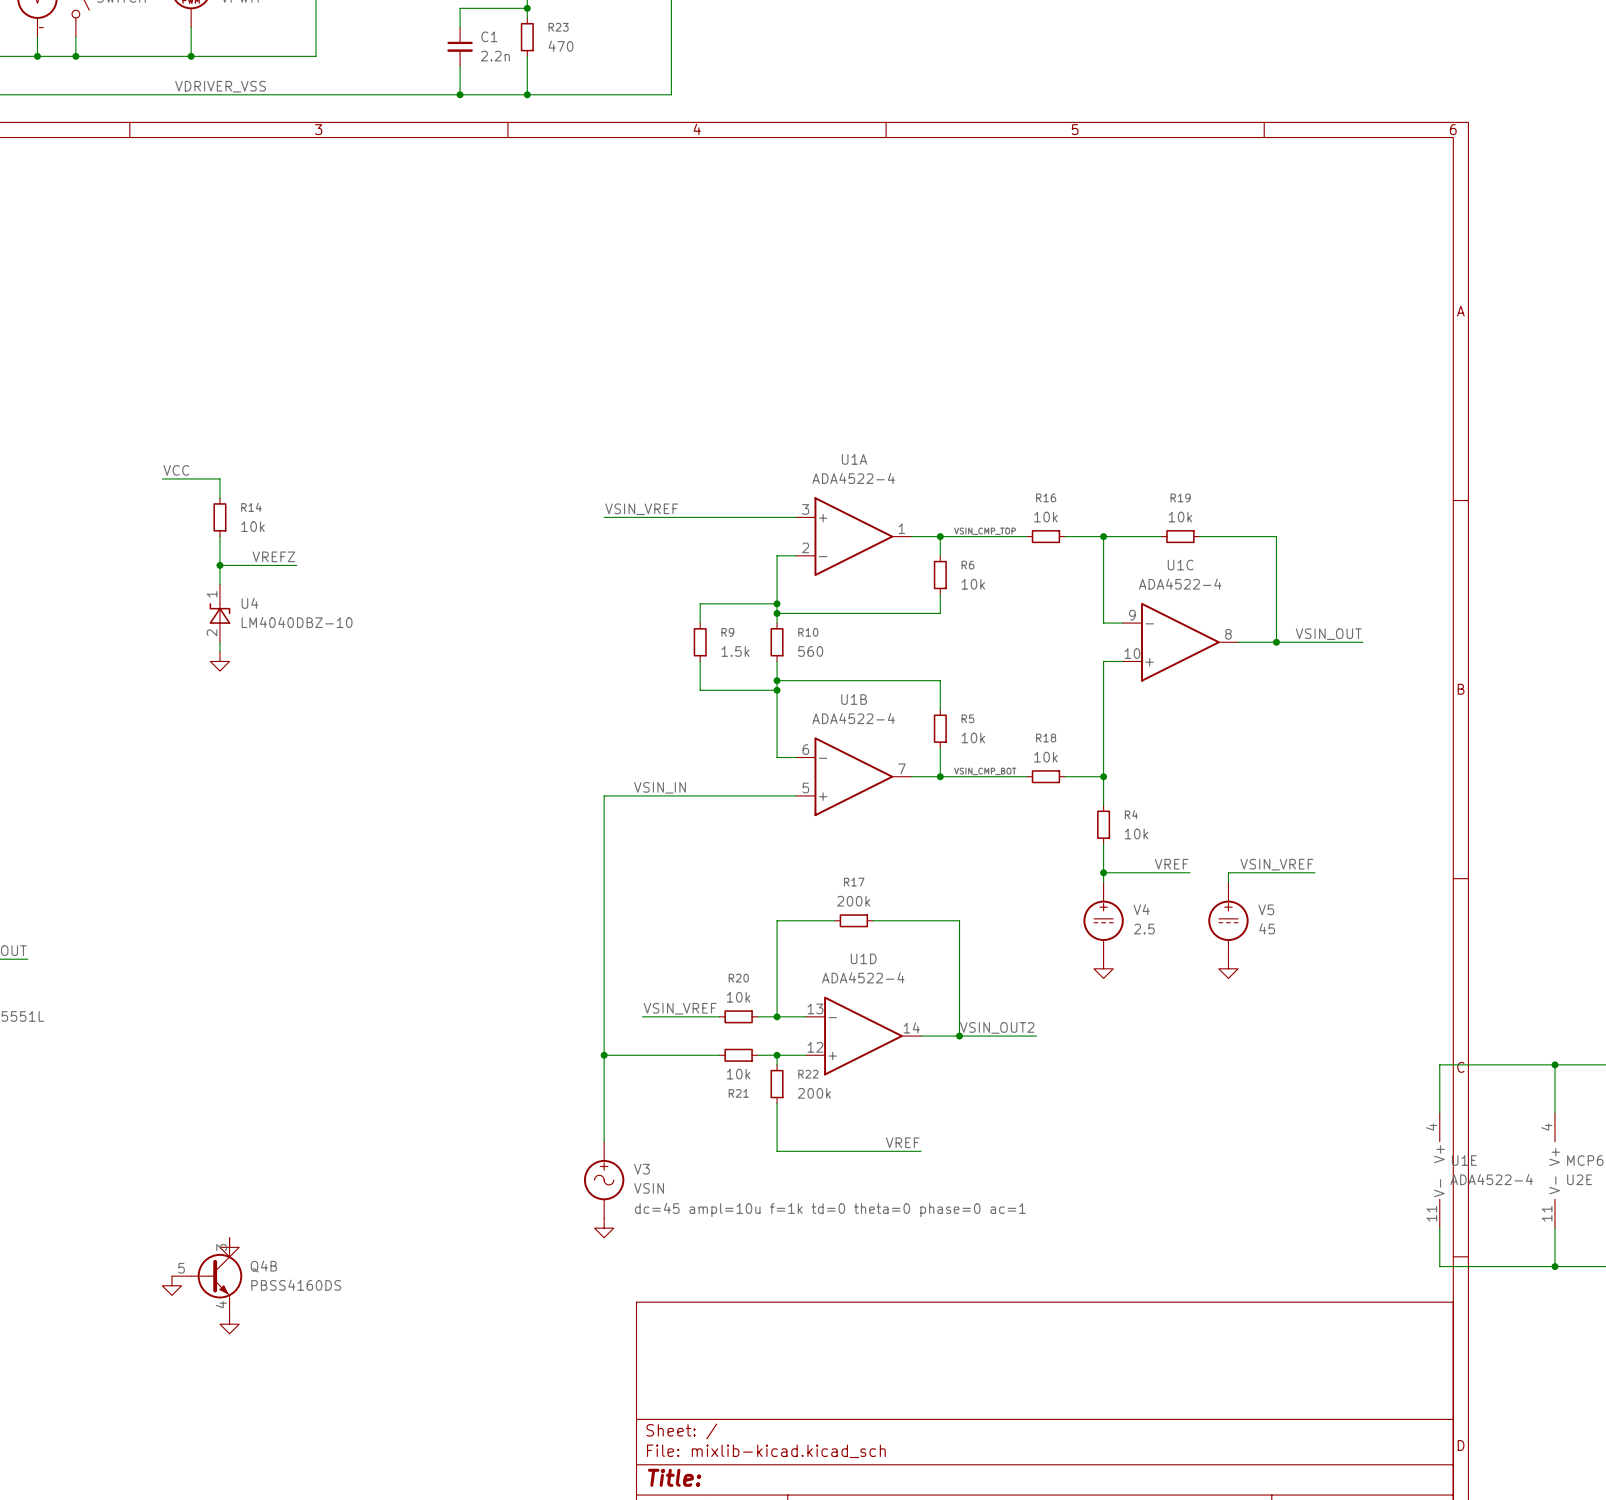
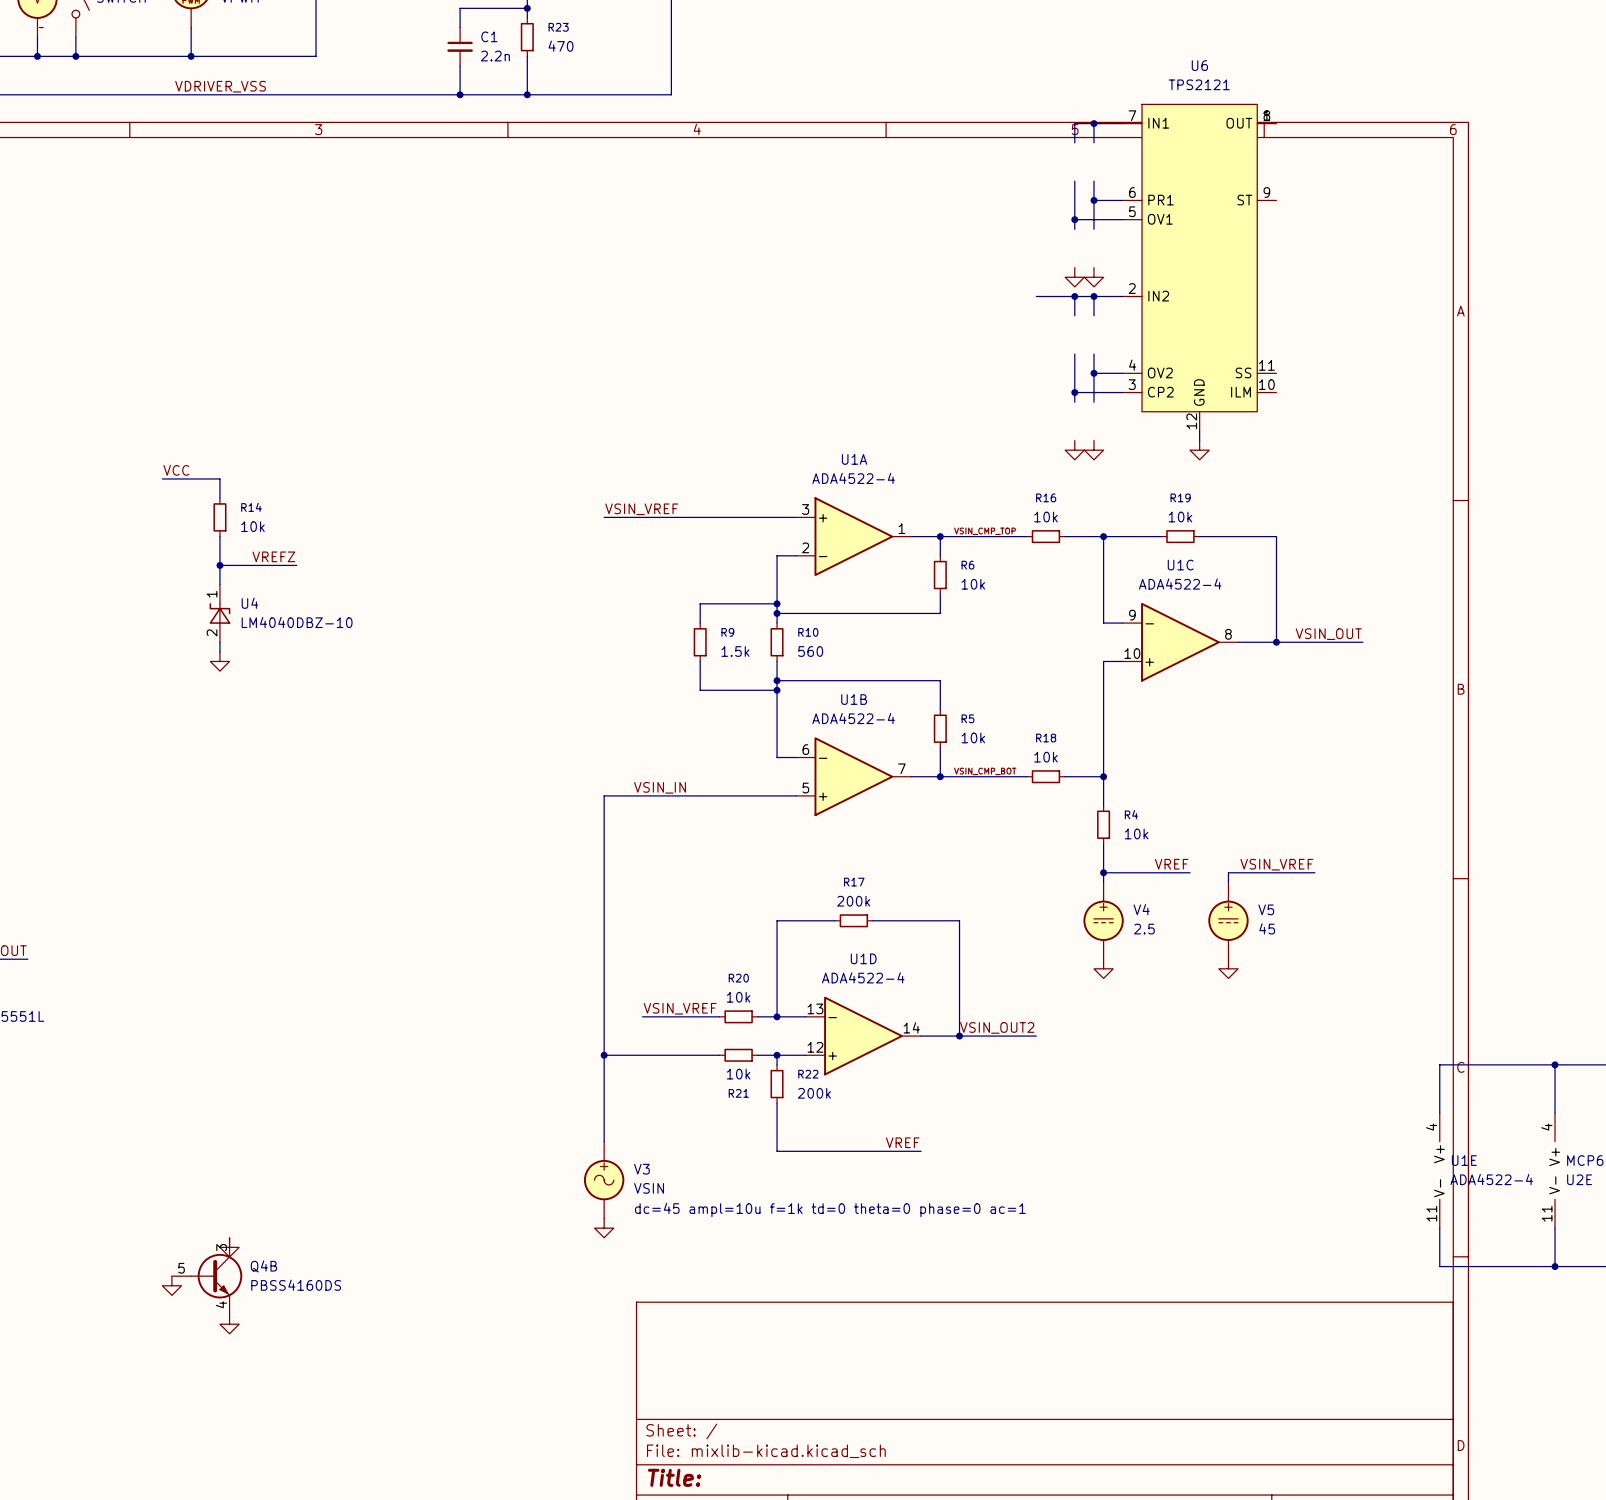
wire: none -> (1093, 123) (1093, 142)
junction: none -> (1093, 123)
wire: none -> (1122, 123) (1074, 123) (1074, 142)
wire: none -> (1074, 181) (1074, 229)
wire: none -> (1093, 181) (1093, 229)
wire: none -> (1093, 200) (1122, 200)
junction: none -> (1093, 200)
wire: none -> (1074, 219) (1122, 219)
junction: none -> (1074, 219)
U6: none -> TPS2121 (1199, 267)
power symbol: none -> (1074, 277)
power symbol: none -> (1093, 277)
wire: none -> (1036, 296) (1122, 296)
wire: none -> (1074, 296) (1074, 315)
junction: none -> (1074, 296)
wire: none -> (1093, 296) (1093, 315)
junction: none -> (1093, 296)
wire: none -> (1074, 354) (1074, 402)
wire: none -> (1093, 354) (1093, 402)
wire: none -> (1093, 373) (1122, 373)
junction: none -> (1093, 373)
wire: none -> (1074, 392) (1122, 392)
junction: none -> (1074, 392)
wire: none -> (1199, 430) (1199, 440)
power symbol: none -> (1074, 450)
power symbol: none -> (1093, 450)
power symbol: none -> (1199, 450)

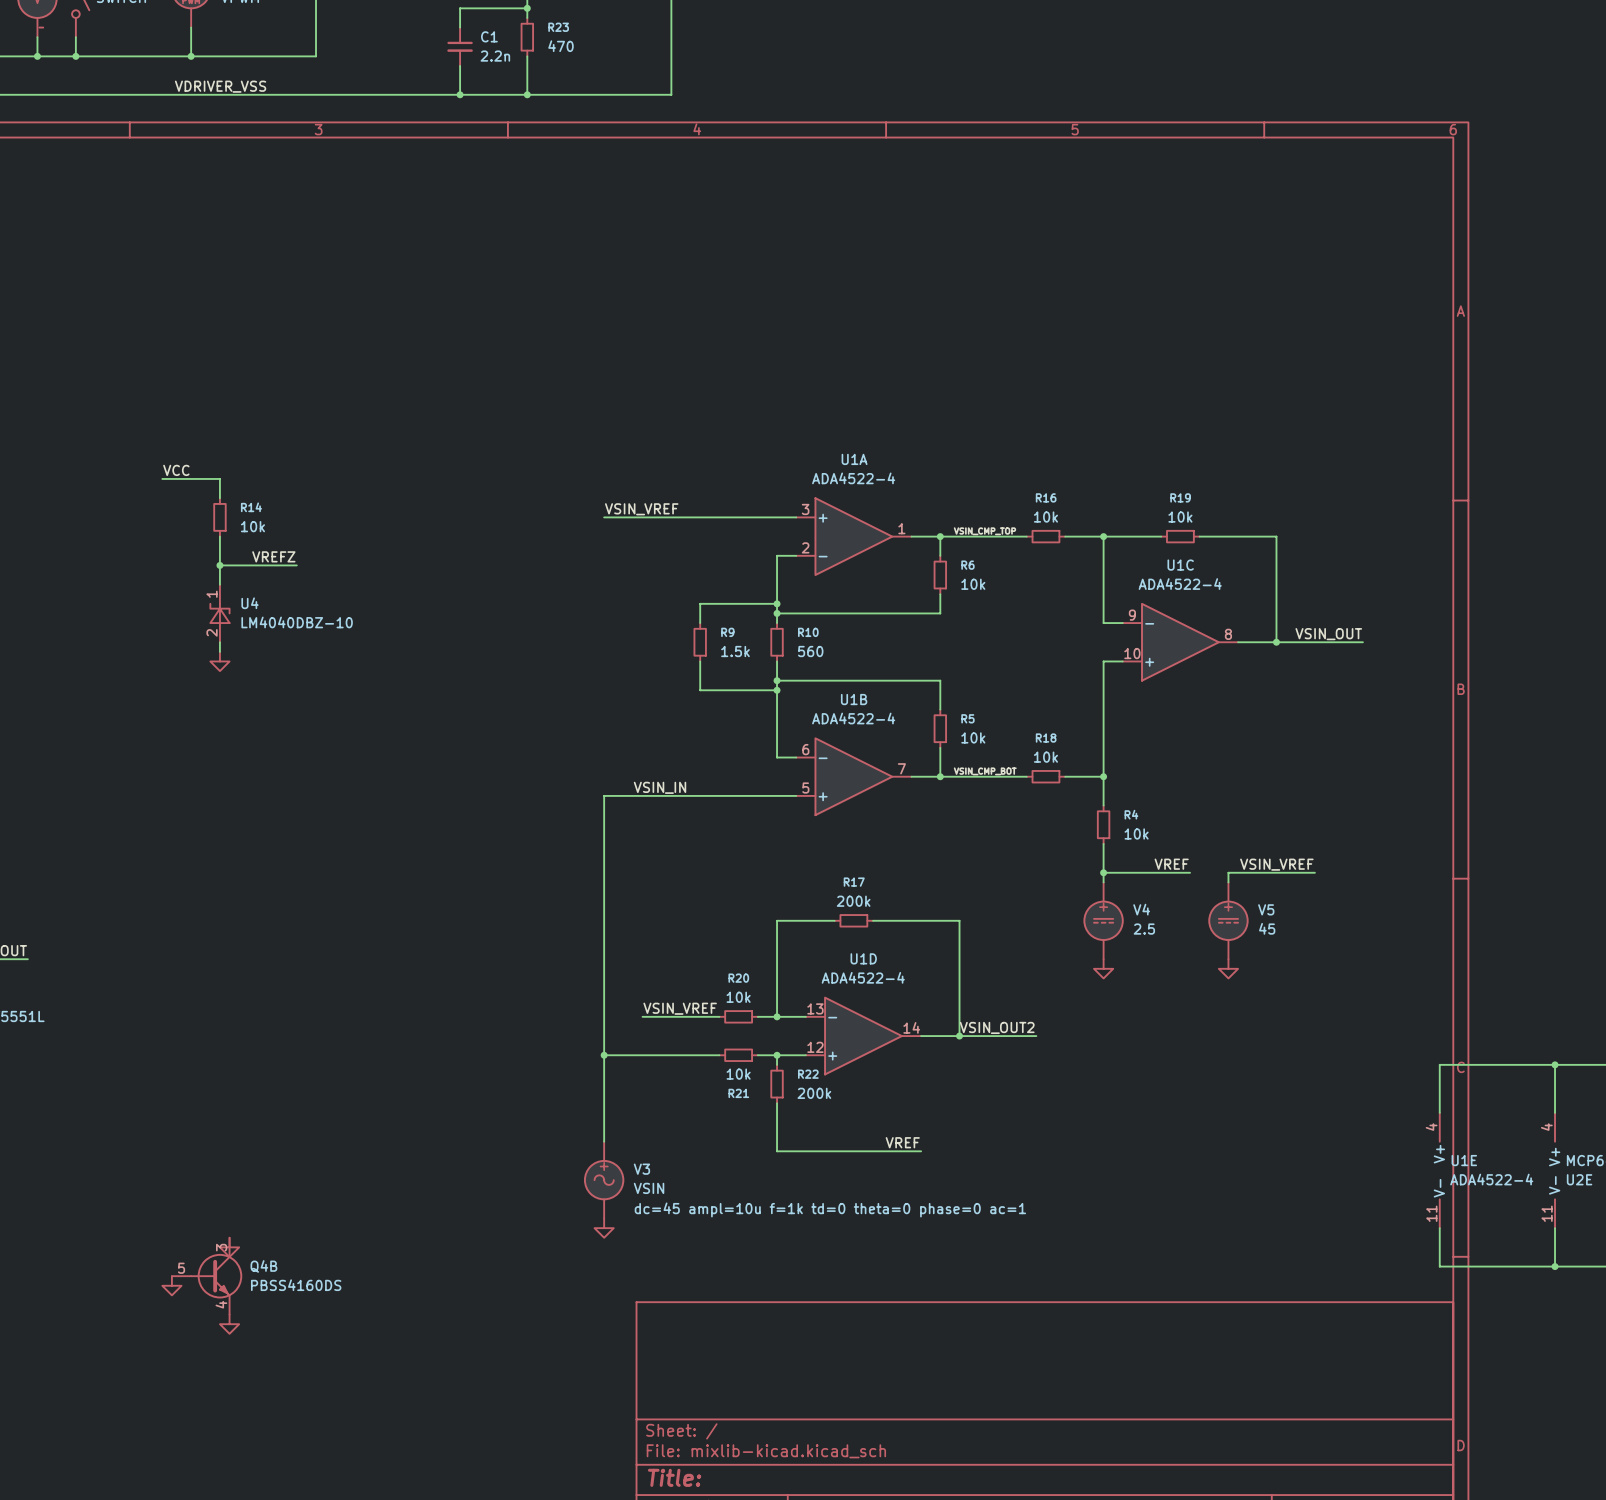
wire: (1093, 123) (1093, 142) -> none
junction: (1093, 123) -> none
wire: (1122, 123) (1074, 123) (1074, 142) -> none
wire: (1074, 181) (1074, 229) -> none
wire: (1093, 181) (1093, 229) -> none
wire: (1093, 200) (1122, 200) -> none
junction: (1093, 200) -> none
wire: (1074, 219) (1122, 219) -> none
junction: (1074, 219) -> none
U6: TPS2121 (1199, 267) -> none
power symbol: (1074, 277) -> none
power symbol: (1093, 277) -> none
wire: (1036, 296) (1122, 296) -> none
wire: (1074, 296) (1074, 315) -> none
junction: (1074, 296) -> none
wire: (1093, 296) (1093, 315) -> none
junction: (1093, 296) -> none
wire: (1074, 354) (1074, 402) -> none
wire: (1093, 354) (1093, 402) -> none
wire: (1093, 373) (1122, 373) -> none
junction: (1093, 373) -> none
wire: (1074, 392) (1122, 392) -> none
junction: (1074, 392) -> none
wire: (1199, 430) (1199, 440) -> none
power symbol: (1074, 450) -> none
power symbol: (1093, 450) -> none
power symbol: (1199, 450) -> none

